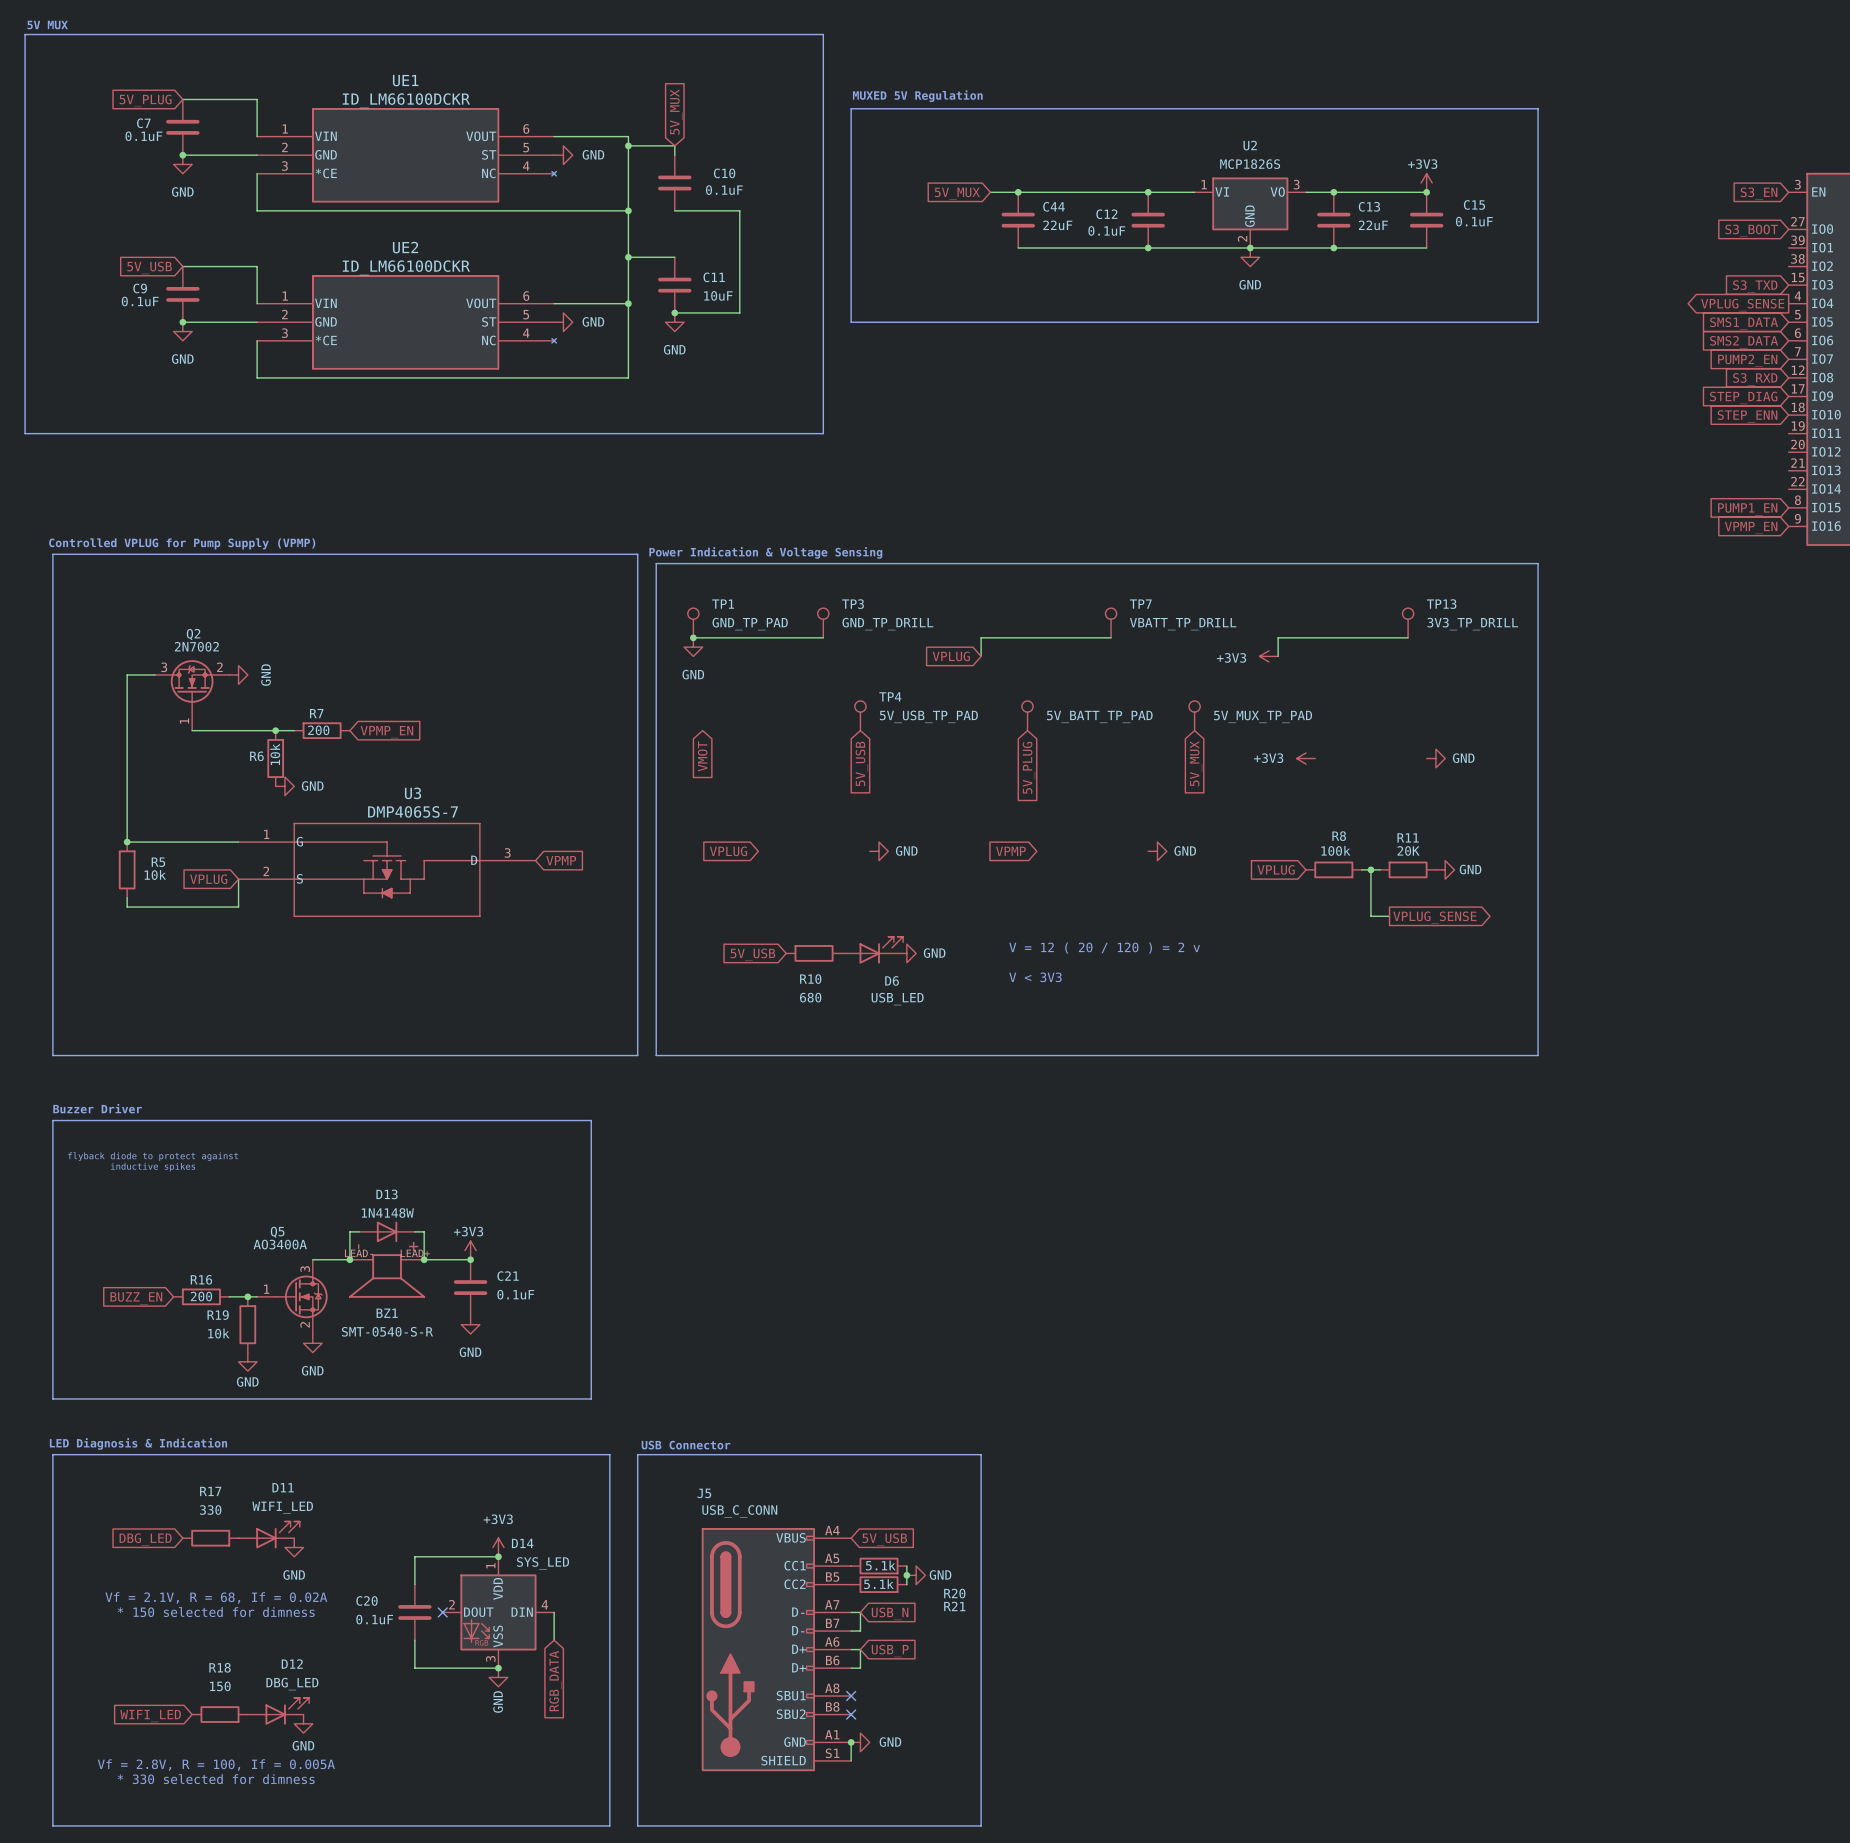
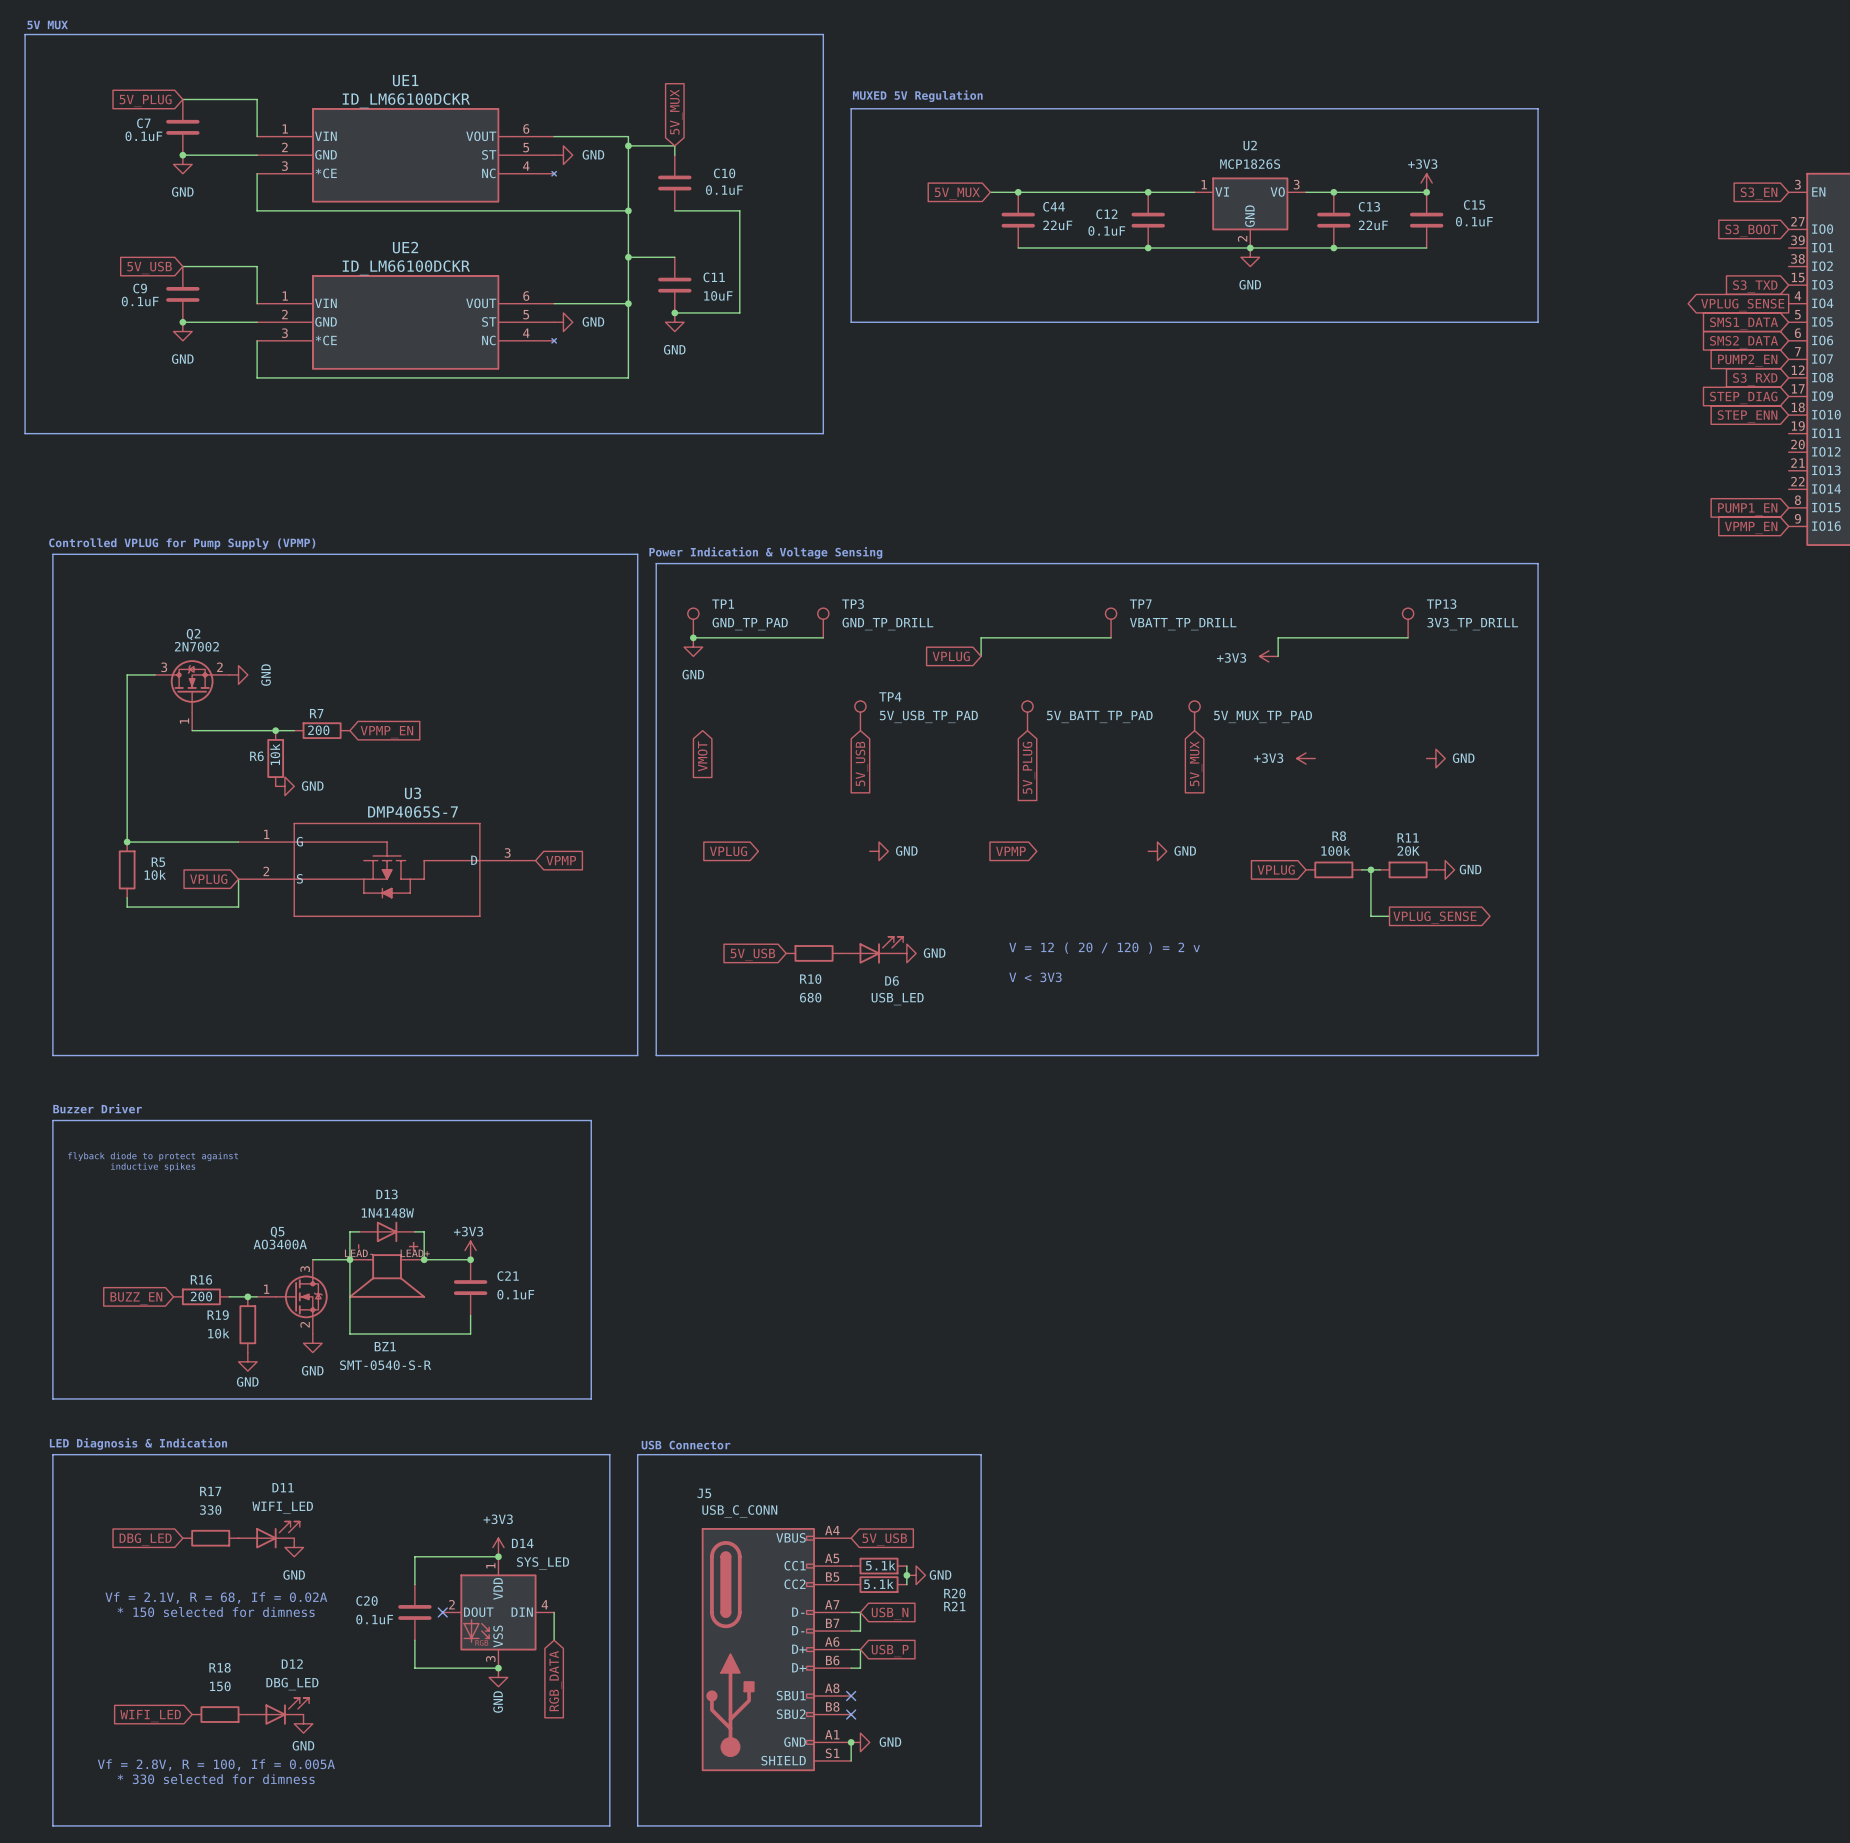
wire: none -> (349, 1259) (349, 1334) (470, 1334) (470, 1315)
BZ1 name position: BZ1 (387, 1313) -> BZ1 (385, 1346)
power symbol: GND (470, 1324) -> none
BZ1 value position: SMT-0540-S-R (387, 1331) -> SMT-0540-S-R (385, 1365)

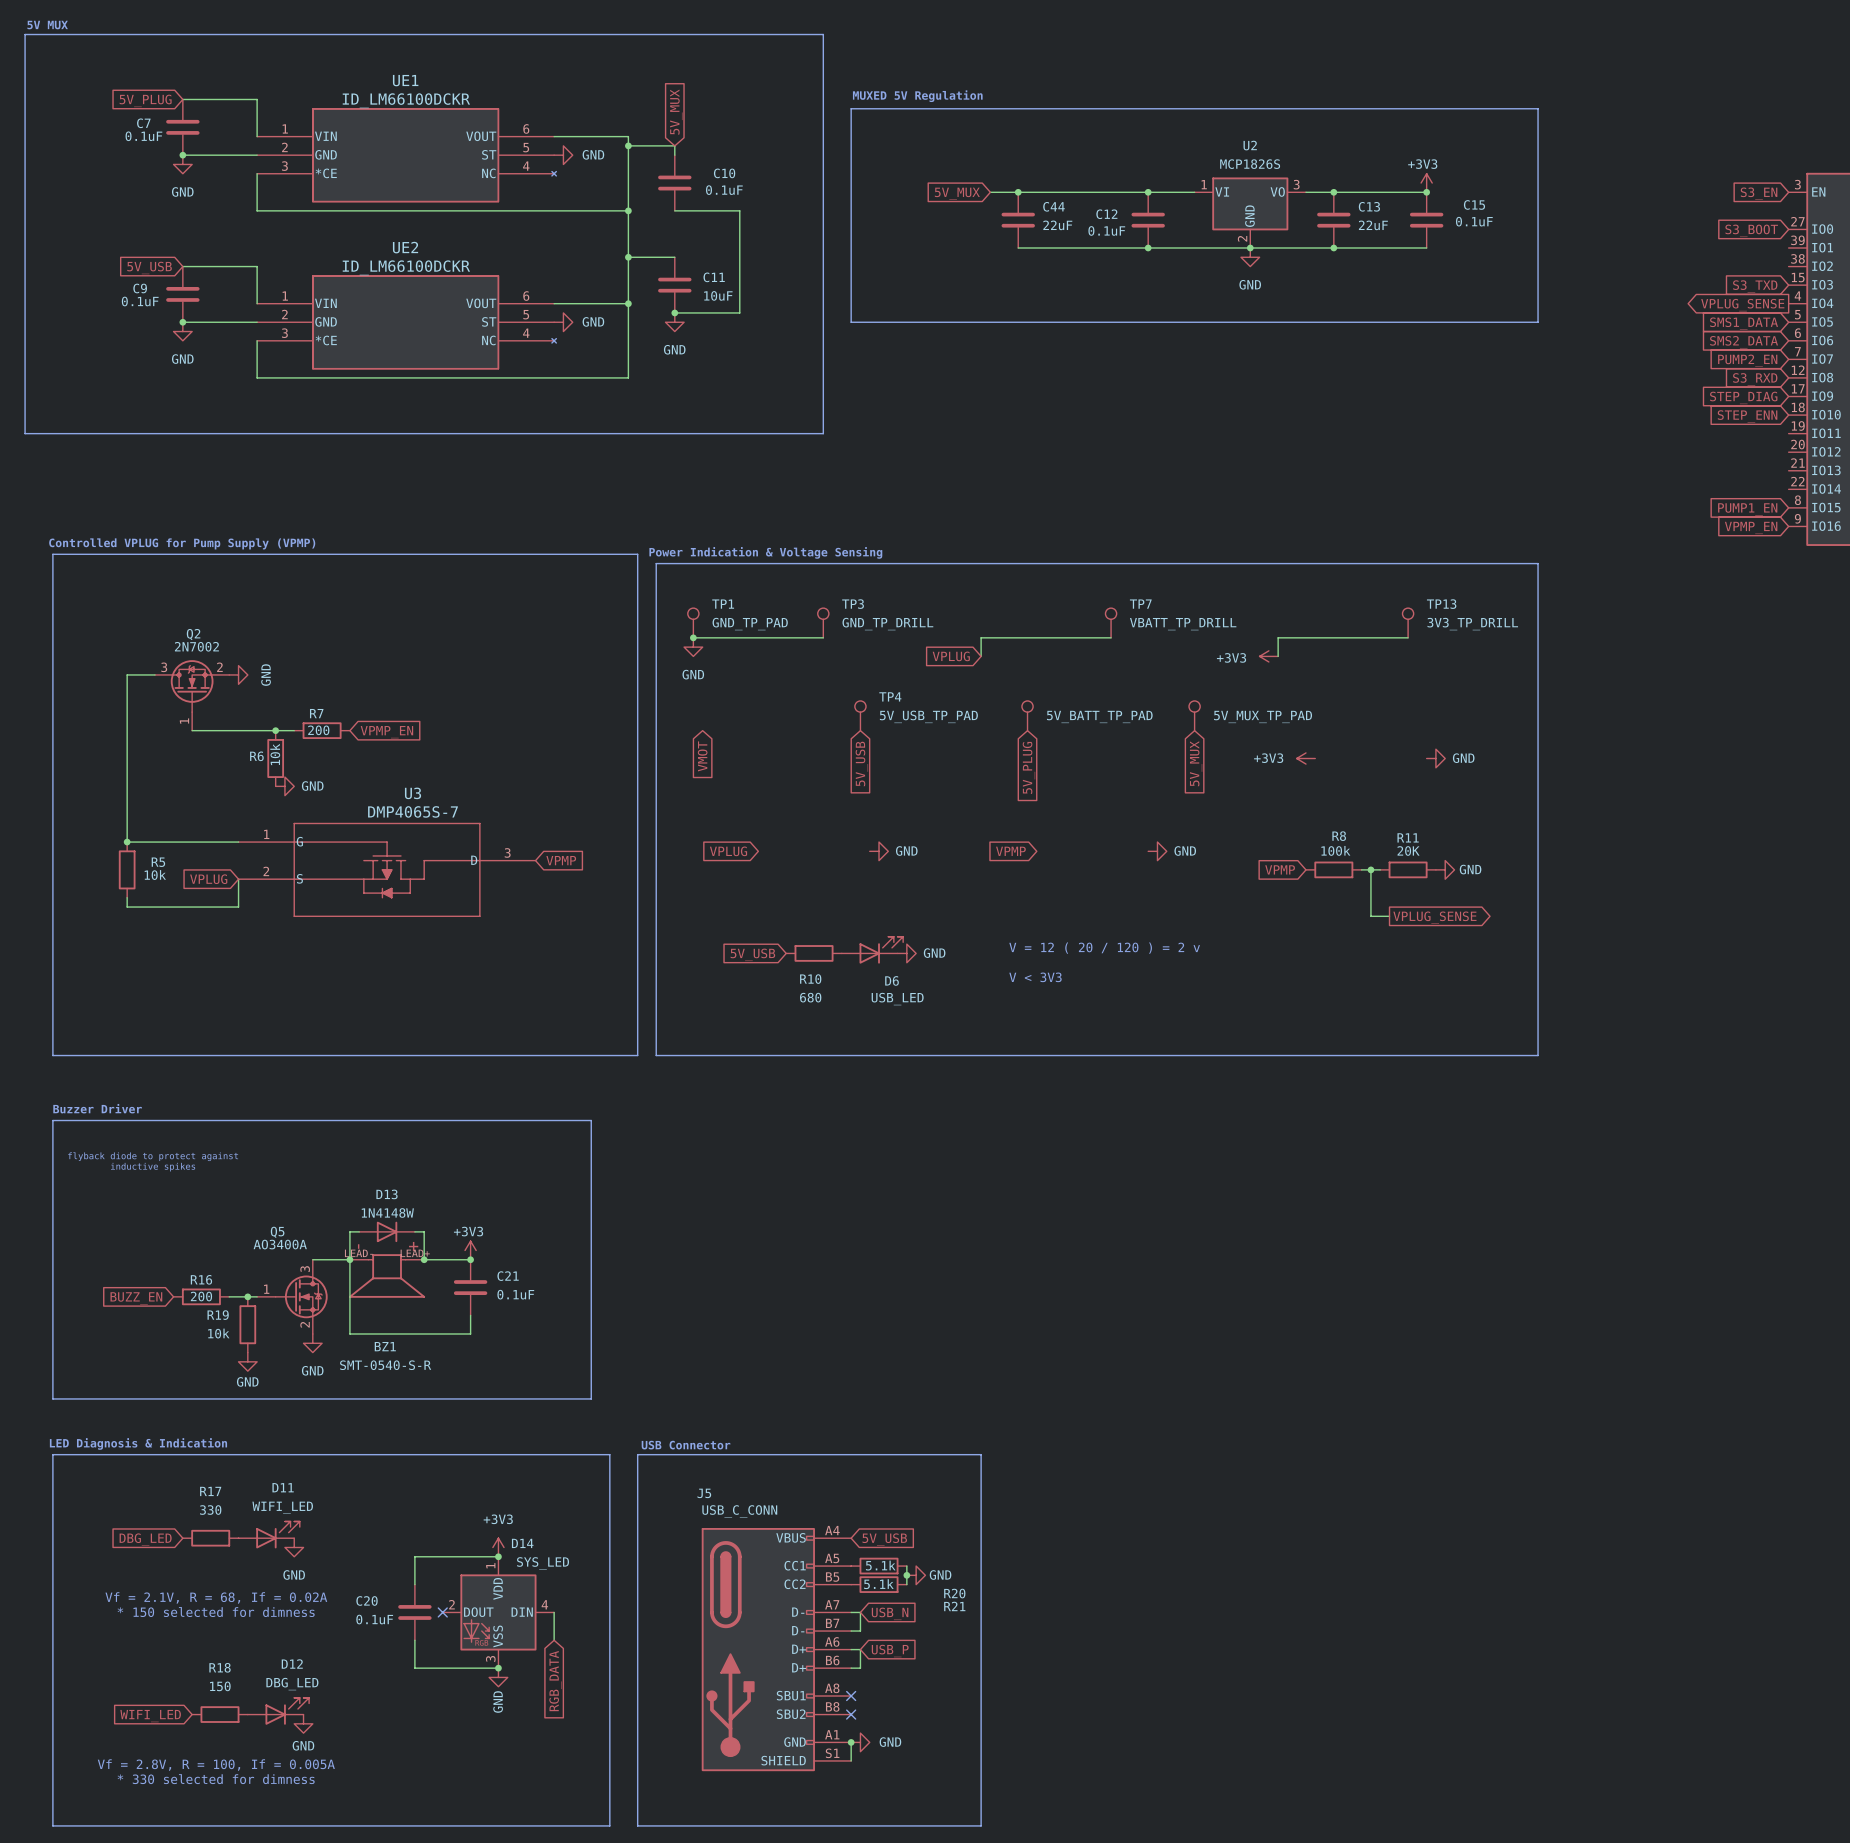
global label: VPLUG (1276, 869) -> VPMP (1280, 869)

